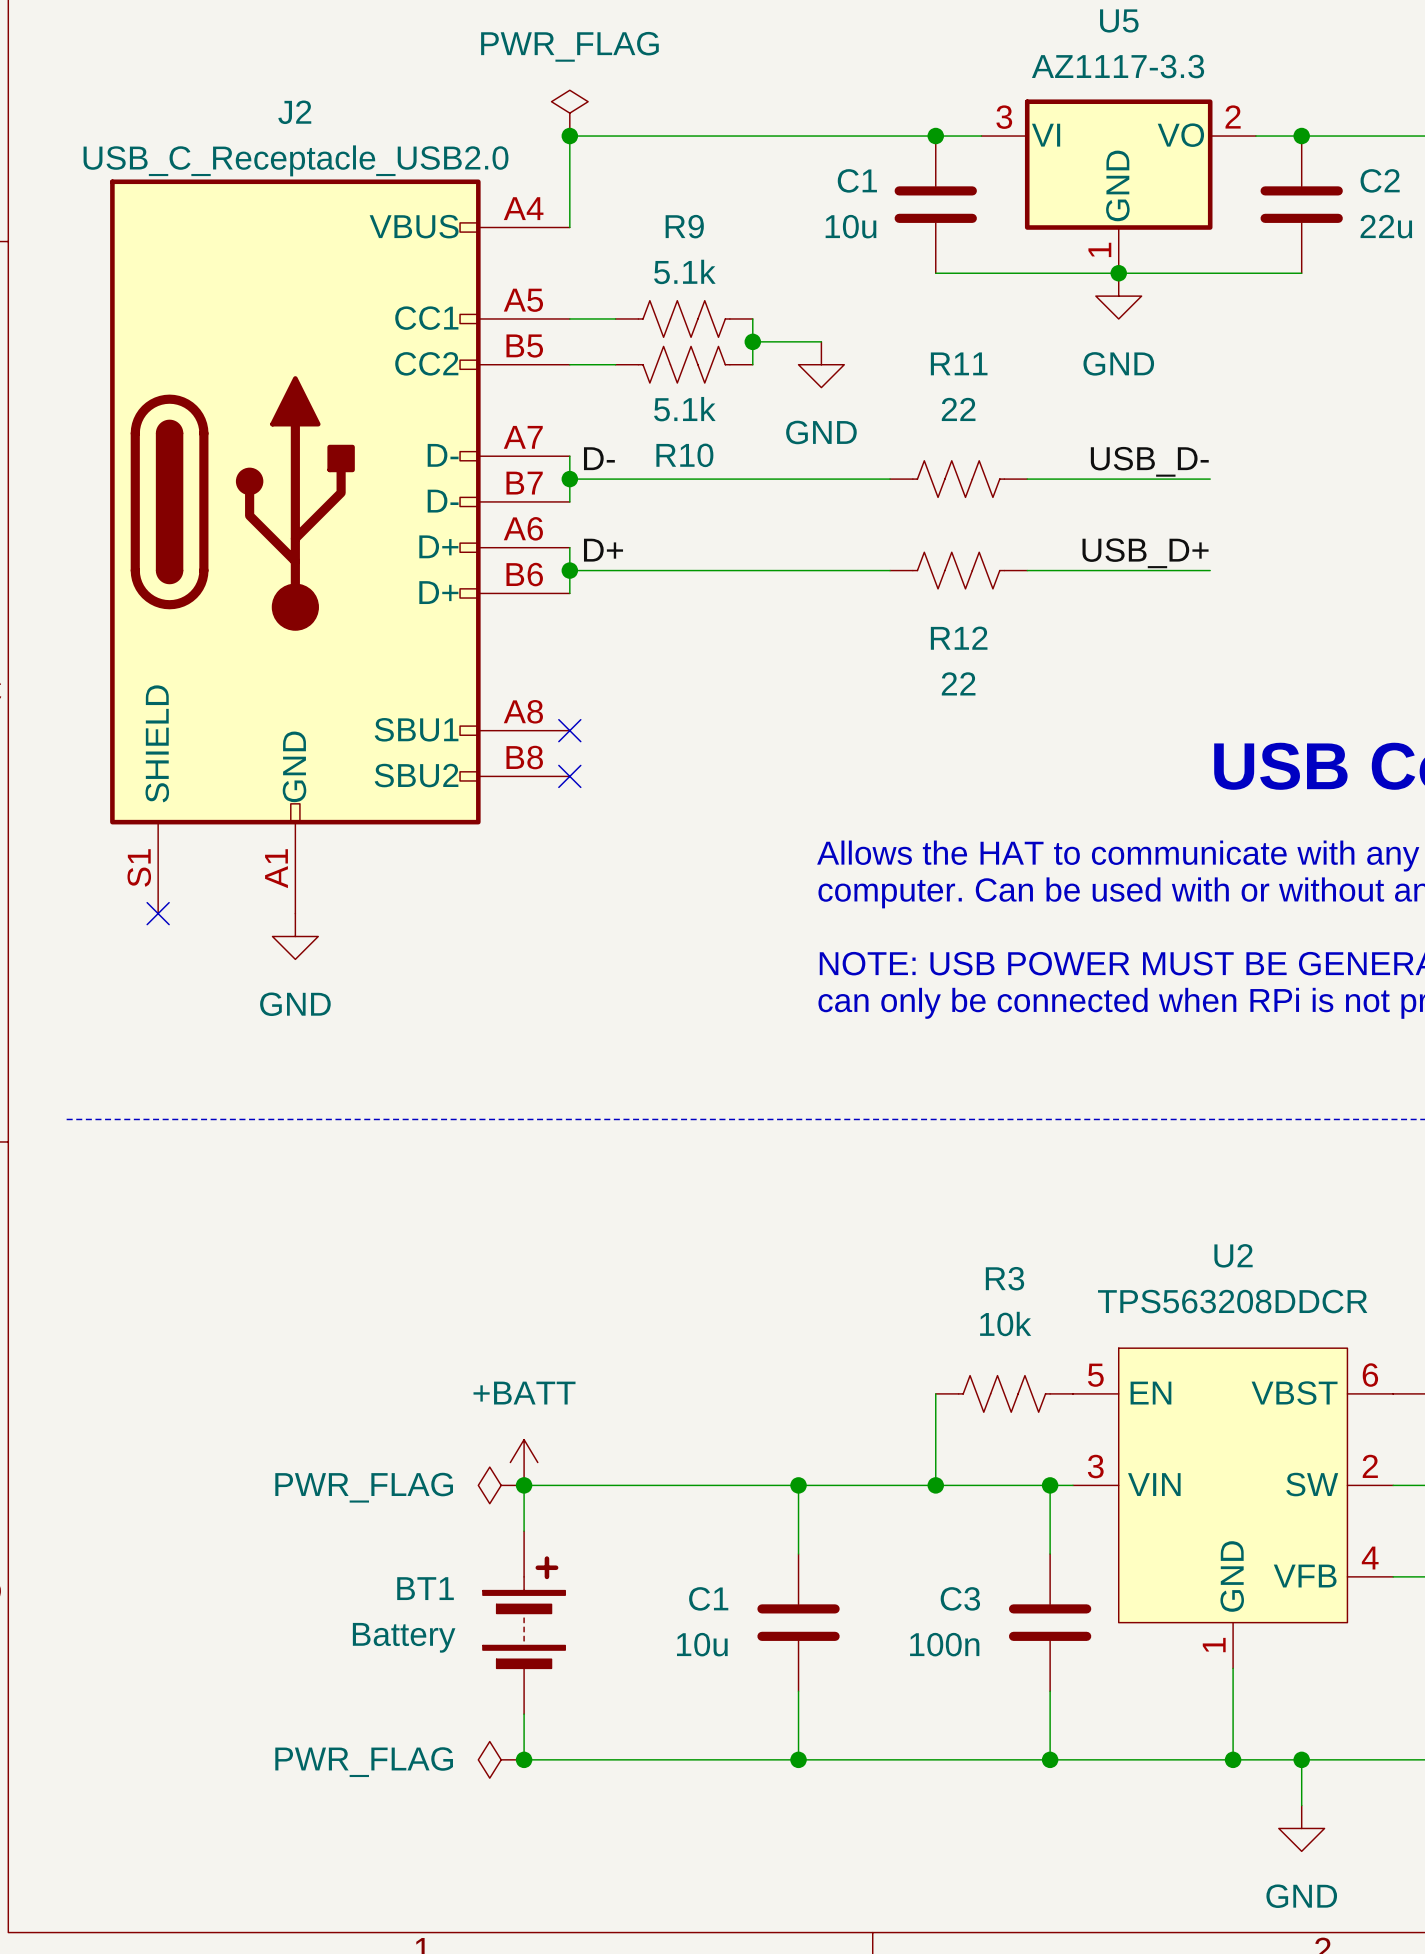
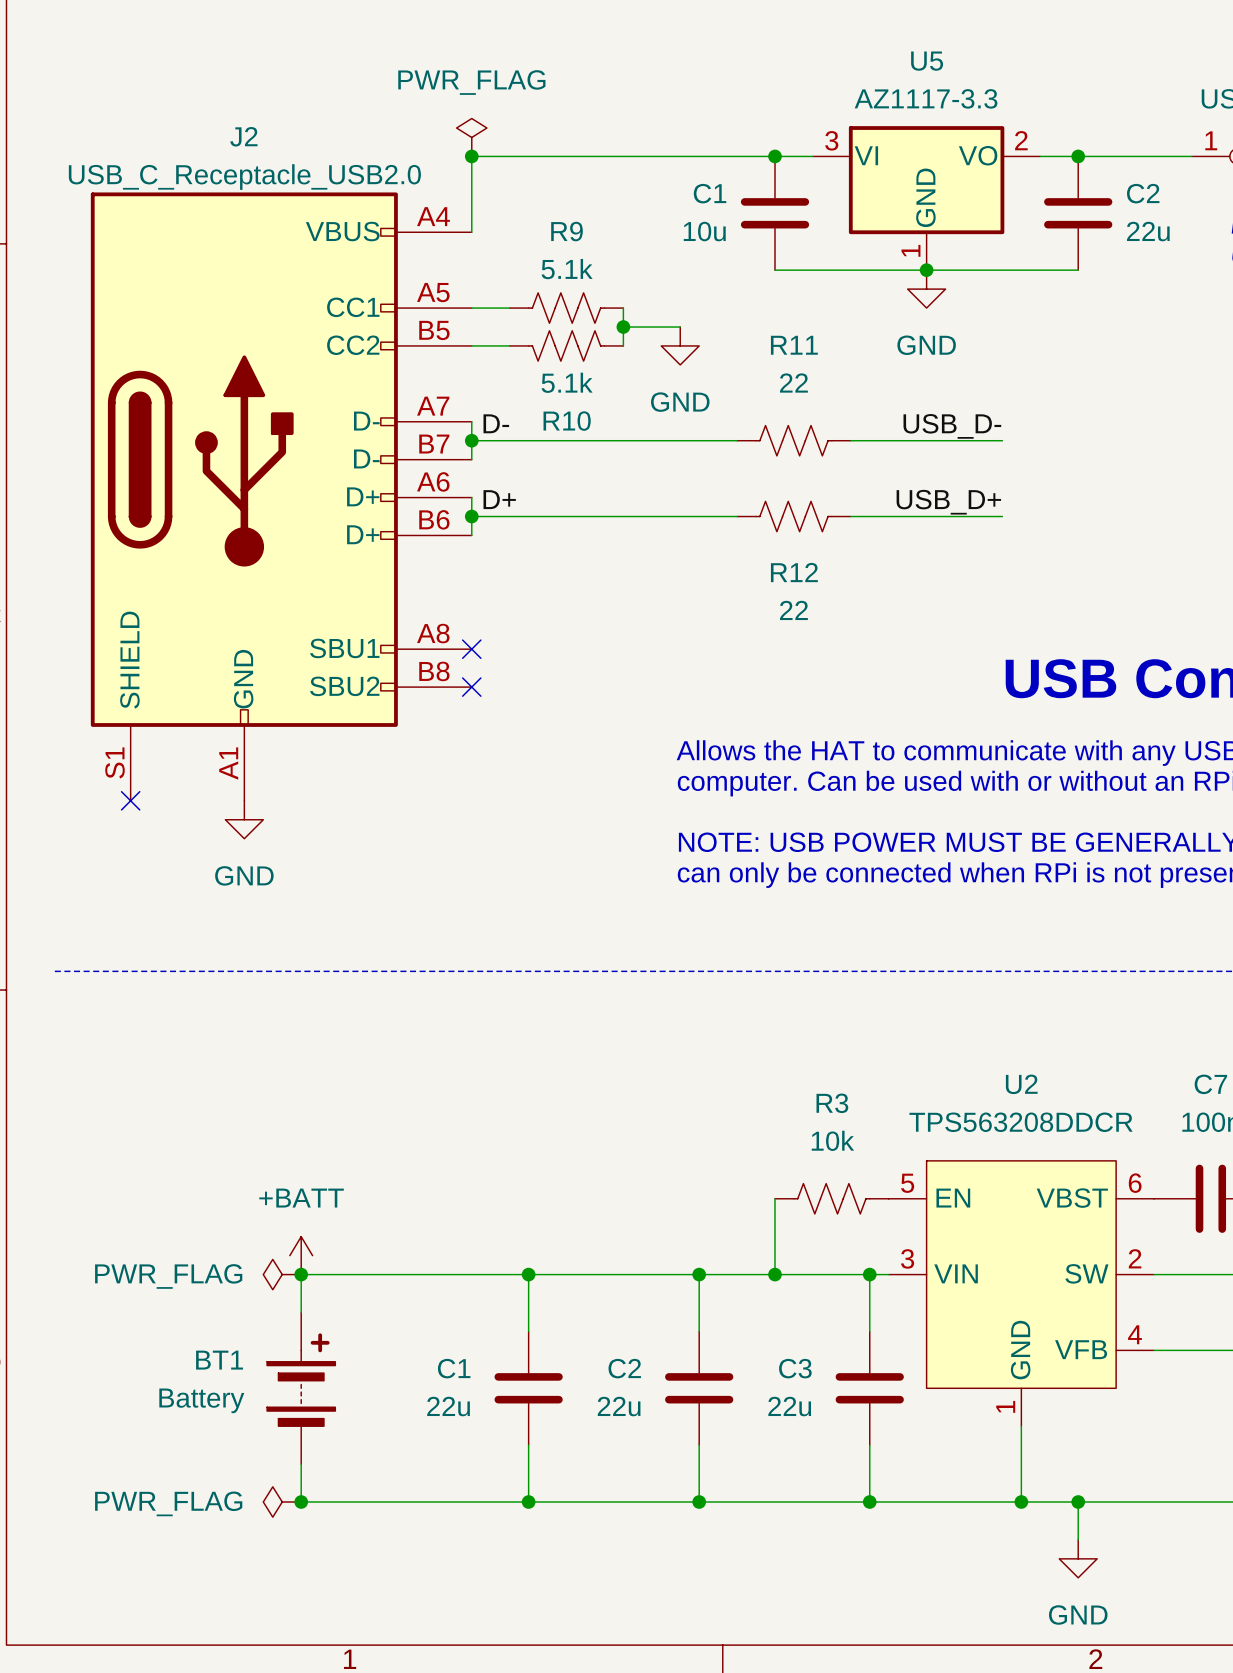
power symbol position: +BATT (524, 1462) -> +BATT (301, 1255)
power symbol: none -> PWR_FLAG (282, 1274)
junction: none -> (301, 1274)
power symbol: PWR_FLAG (501, 1485) -> none
wire: (524, 1485) (524, 1531) -> (433, 1274) (301, 1274) (301, 1312)
junction: (524, 1485) -> none
wire: none -> (528, 1274) (528, 1331)
junction: none -> (528, 1274)
wire: (798, 1485) (798, 1554) -> (699, 1274) (699, 1331)
junction position: (798, 1485) -> (699, 1274)
BT1 position: (524, 1622) -> (301, 1388)
C1: none -> 22u (528, 1388)
C1: 10u (798, 1622) -> none
C2: none -> 22u (699, 1388)
C3 value: 100n (944, 1644) -> 22u (789, 1406)
wire: none -> (528, 1445) (528, 1502)
wire: (798, 1691) (798, 1759) -> (699, 1445) (699, 1502)
wire: (524, 1714) (524, 1759) -> (301, 1464) (301, 1502) (433, 1502)
power symbol: none -> PWR_FLAG (282, 1502)
junction: none -> (301, 1502)
power symbol: PWR_FLAG (501, 1759) -> none
junction: (524, 1759) -> none
junction: none -> (528, 1502)
junction position: (798, 1759) -> (699, 1502)

